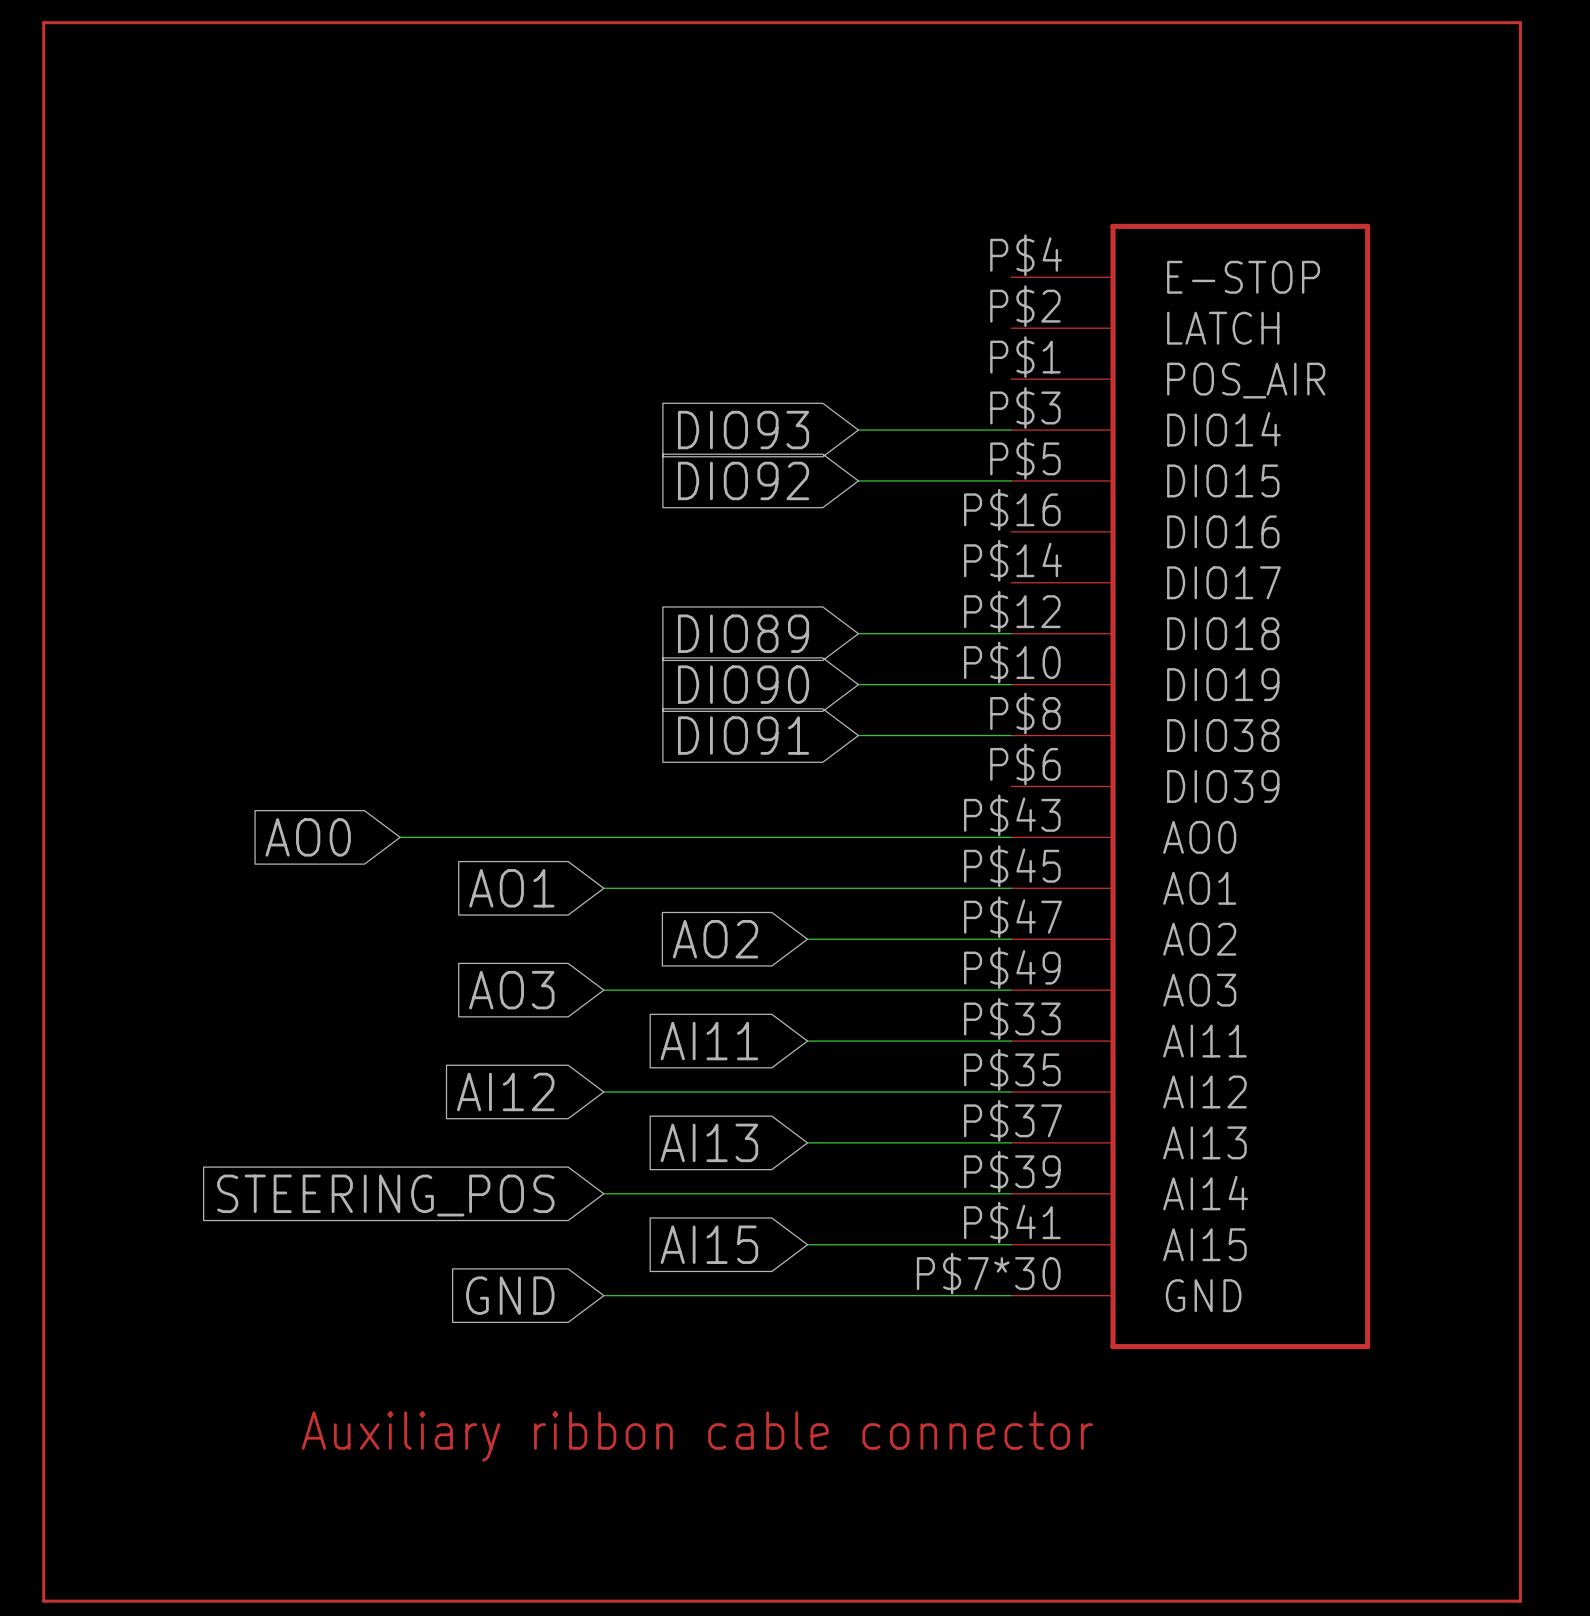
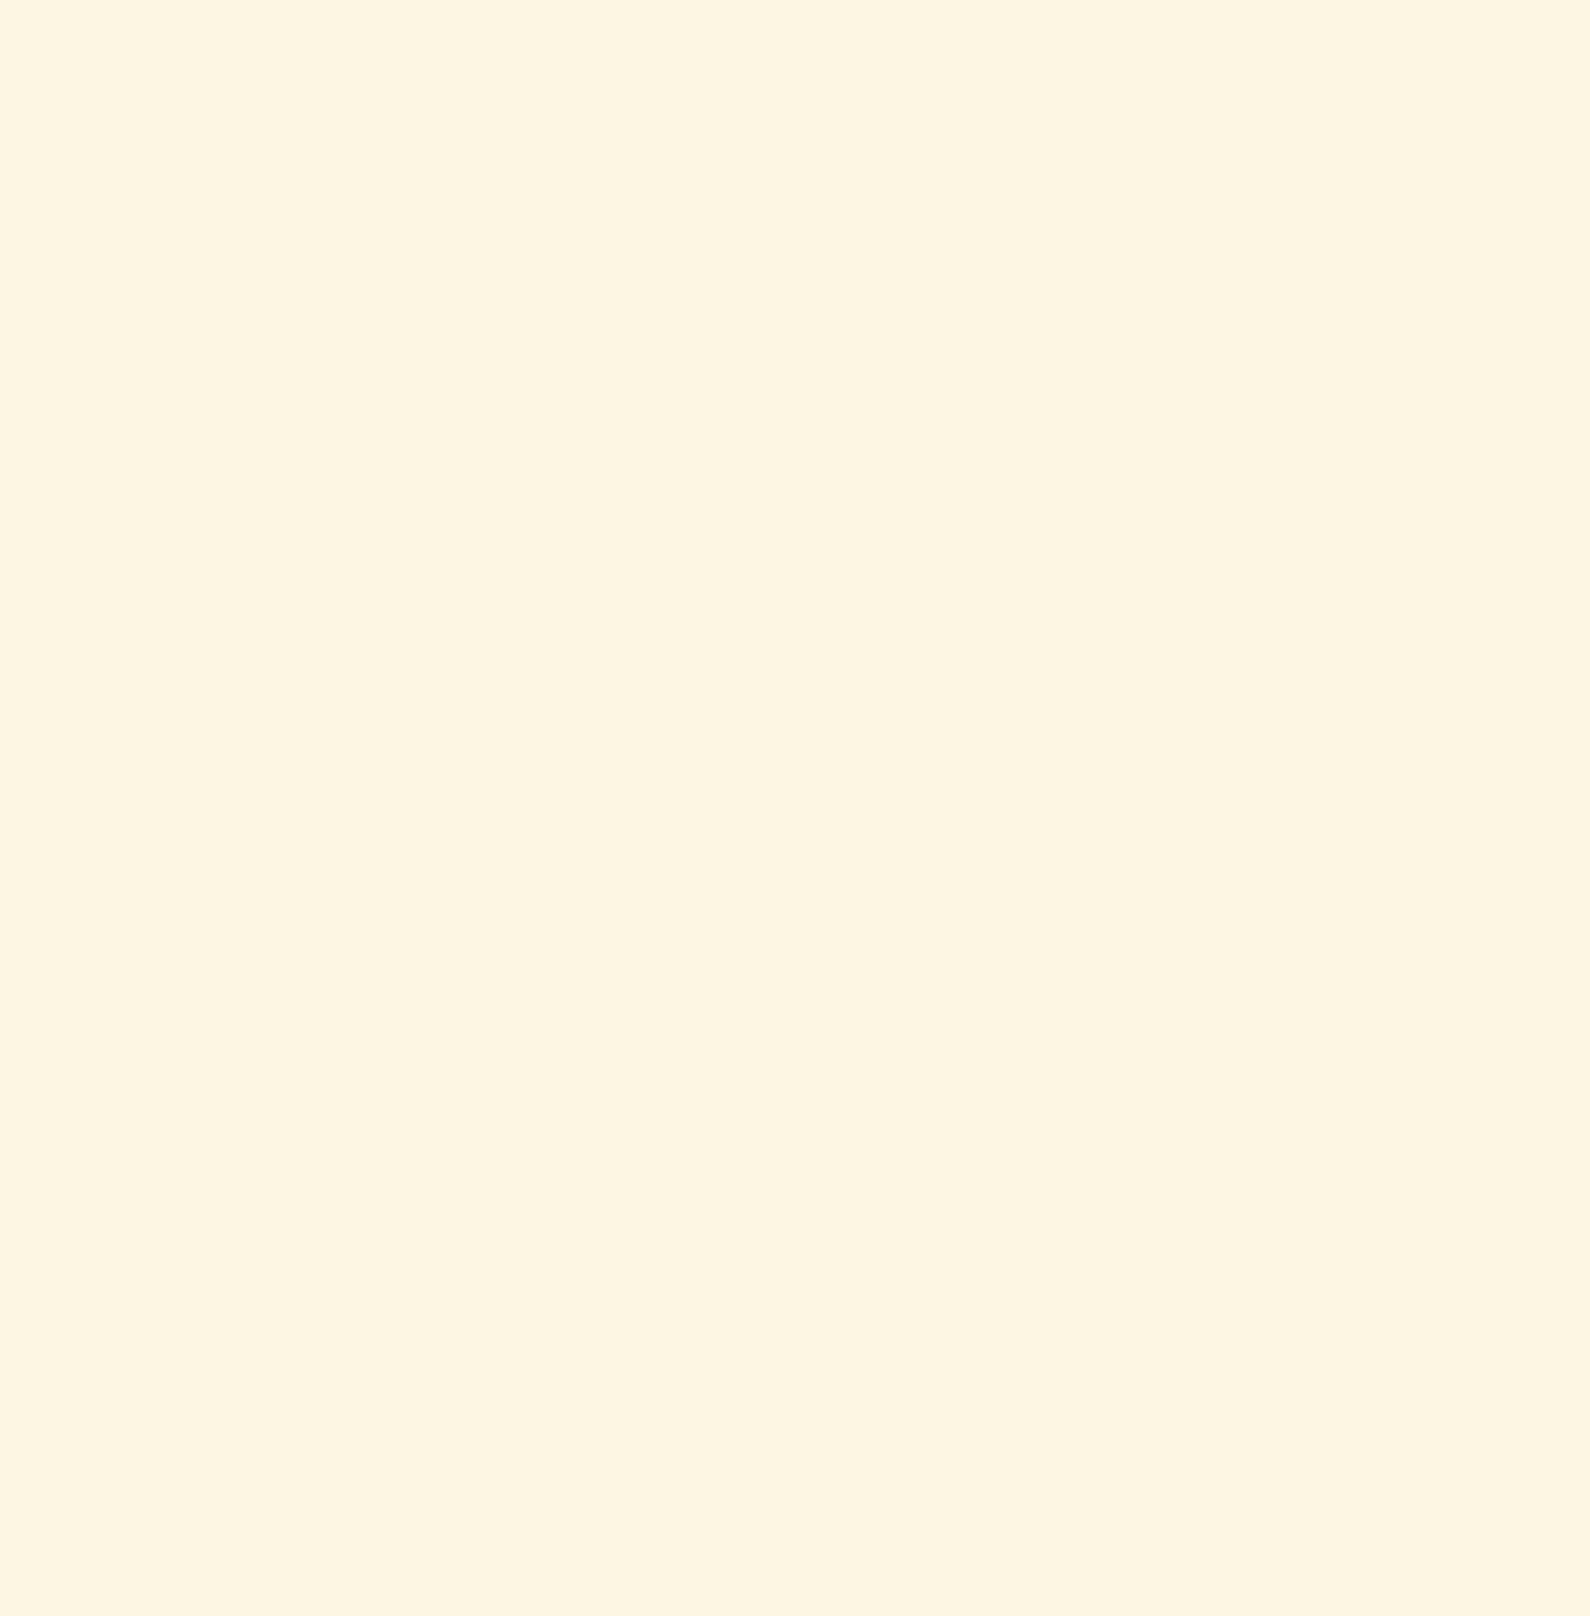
line: (43, 22) (1520, 22) (1520, 1601) (43, 1601) (43, 22) -> none
global label: DIO93 (743, 430) -> none
wire: (858, 430) (1011, 430) -> none
global label: DIO92 (743, 480) -> none
wire: (858, 480) (1011, 480) -> none
global label: DIO89 (743, 633) -> none
wire: (858, 633) (1011, 633) -> none
global label: DIO90 (743, 684) -> none
wire: (858, 684) (1011, 684) -> none
global label: DIO91 (743, 735) -> none
wire: (858, 735) (1011, 735) -> none
part: (1190, 786) -> none
global label: AO0 (308, 837) -> none
wire: (400, 837) (1011, 837) -> none
global label: AO1 (511, 888) -> none
wire: (603, 888) (1011, 888) -> none
global label: AO2 (715, 939) -> none
wire: (807, 939) (1011, 939) -> none
global label: AO3 (511, 990) -> none
wire: (603, 990) (1011, 990) -> none
global label: AI11 (709, 1041) -> none
wire: (807, 1041) (1011, 1041) -> none
global label: AI12 (505, 1091) -> none
wire: (603, 1091) (1011, 1091) -> none
global label: AI13 (709, 1142) -> none
wire: (807, 1142) (1011, 1142) -> none
wire: (603, 1193) (1011, 1193) -> none
global label: STEERING_POS (385, 1195) -> none
global label: AI15 (709, 1244) -> none
wire: (807, 1244) (1011, 1244) -> none
global label: GND (510, 1295) -> none
wire: (603, 1295) (1011, 1295) -> none
text: Auxiliary ribbon cable connector (697, 1436) -> none

